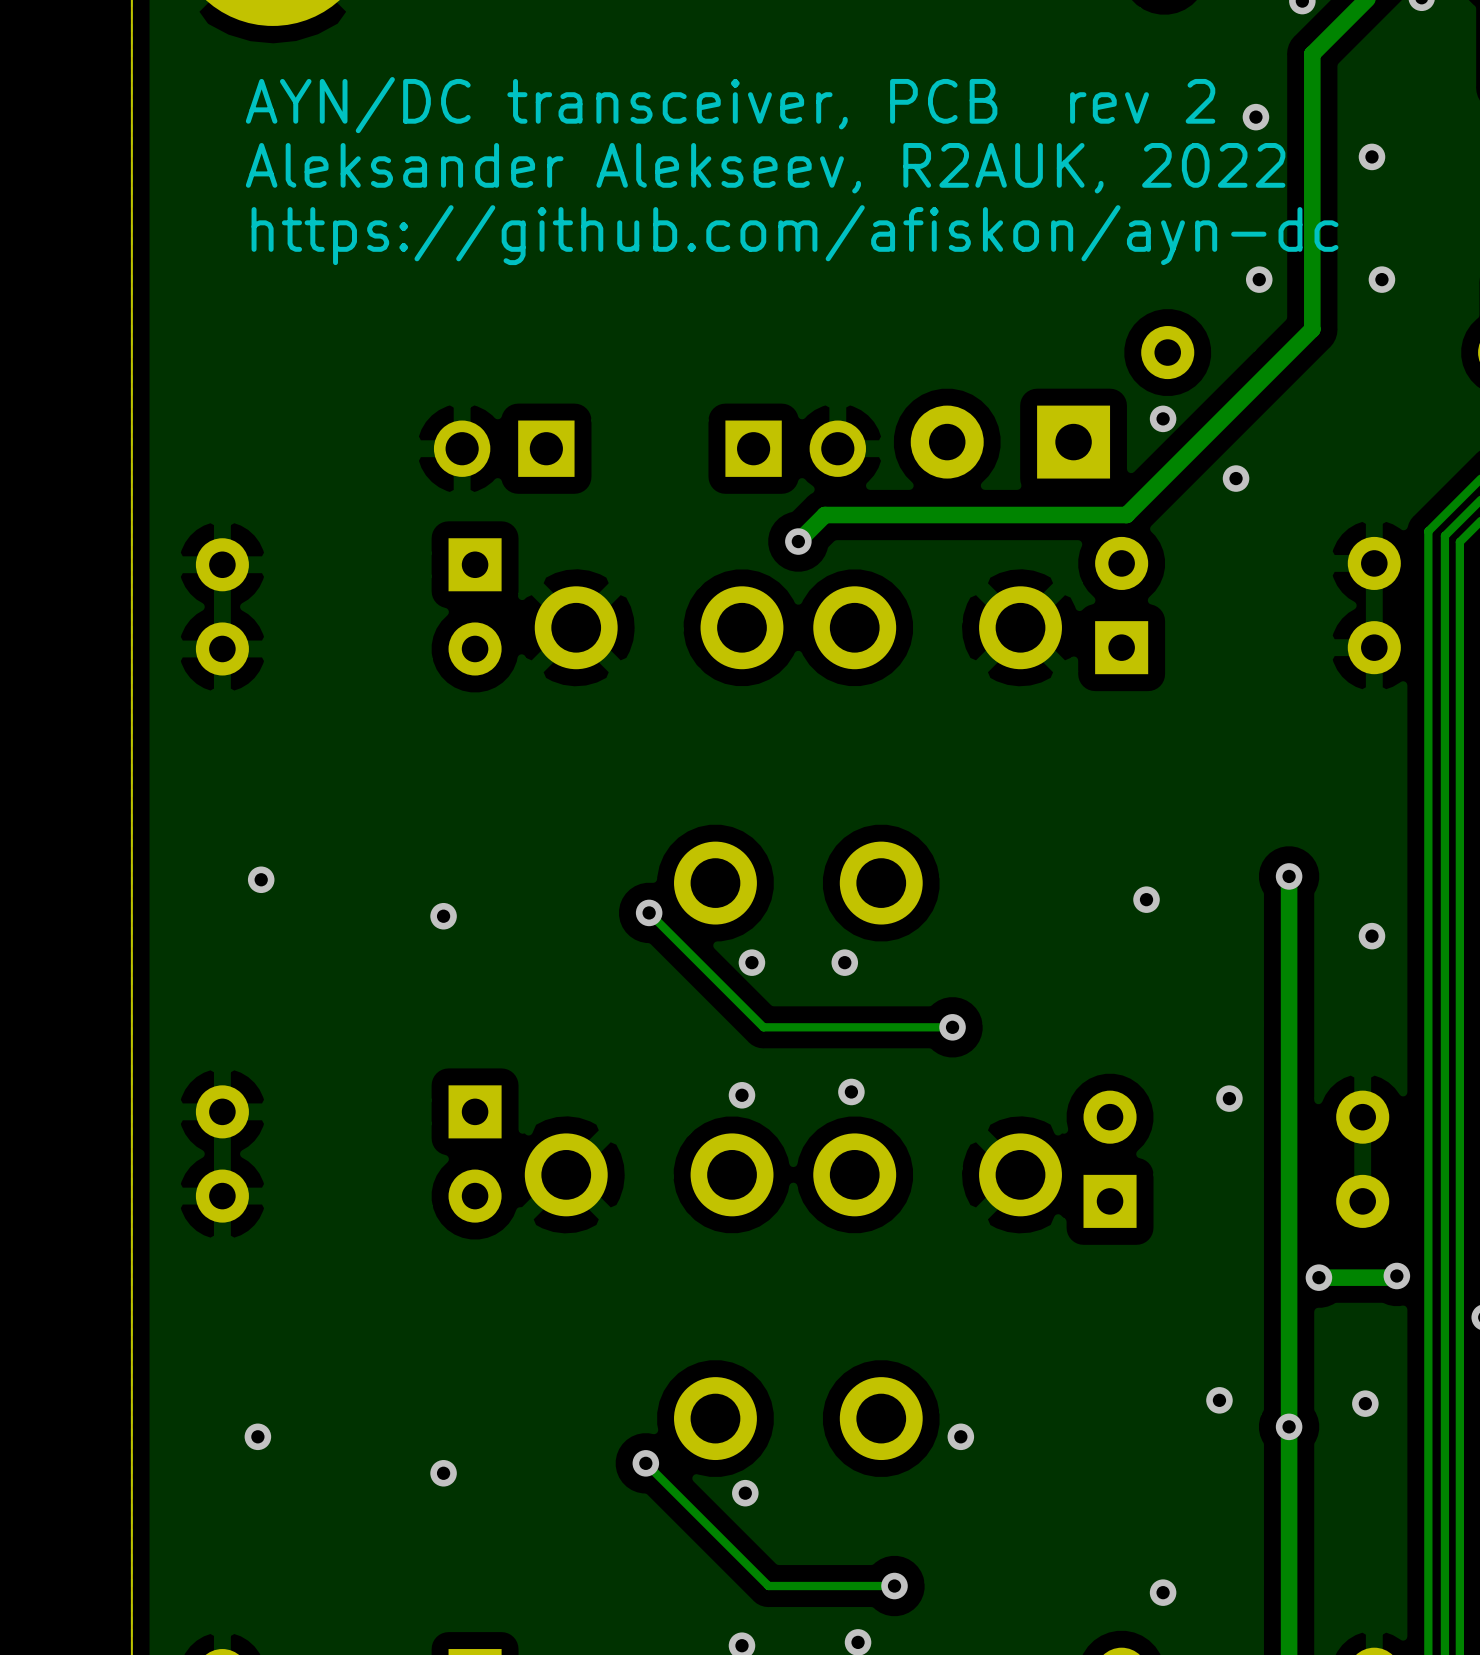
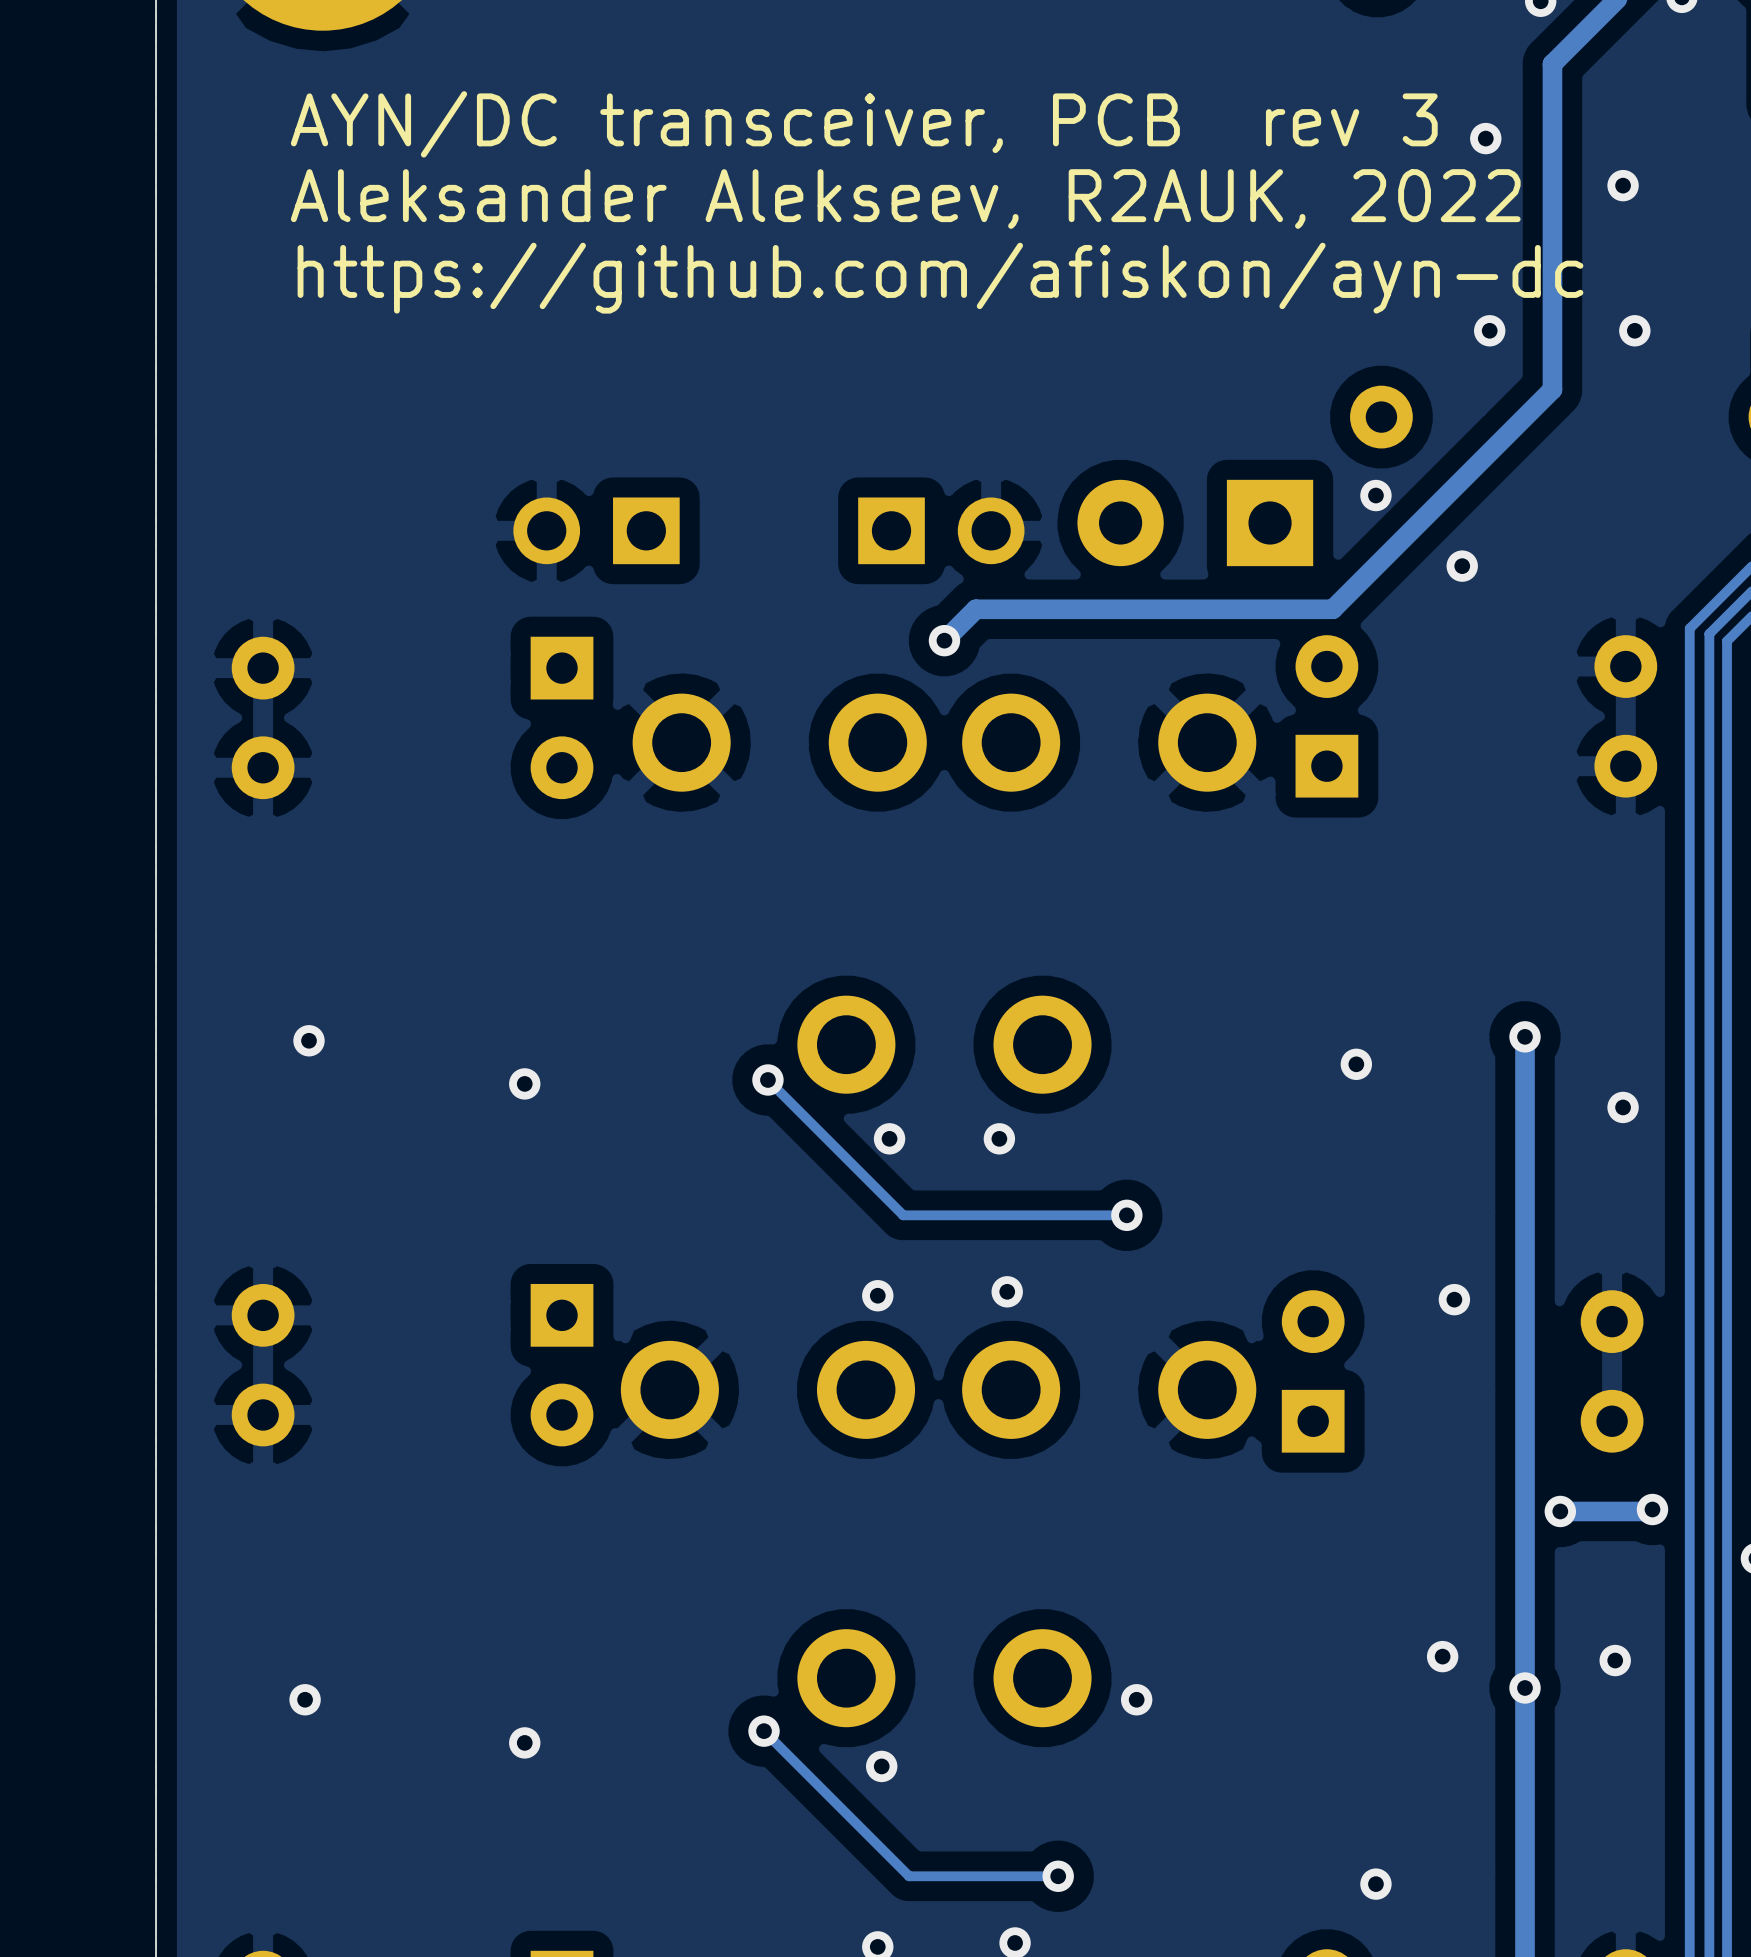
text: AYN/DC transceiver, PCB rev 2 (730, 105) -> AYN/DC transceiver, PCB rev 3 (864, 124)

